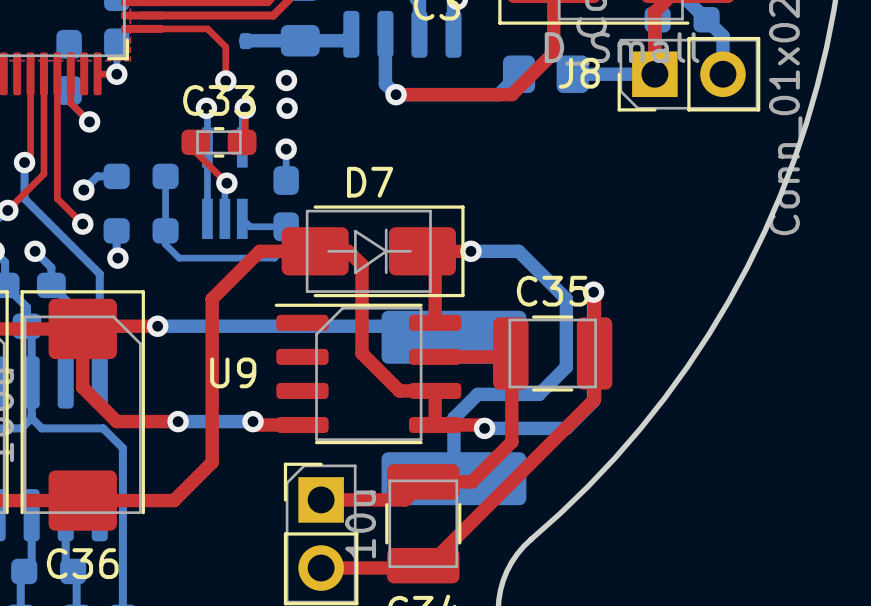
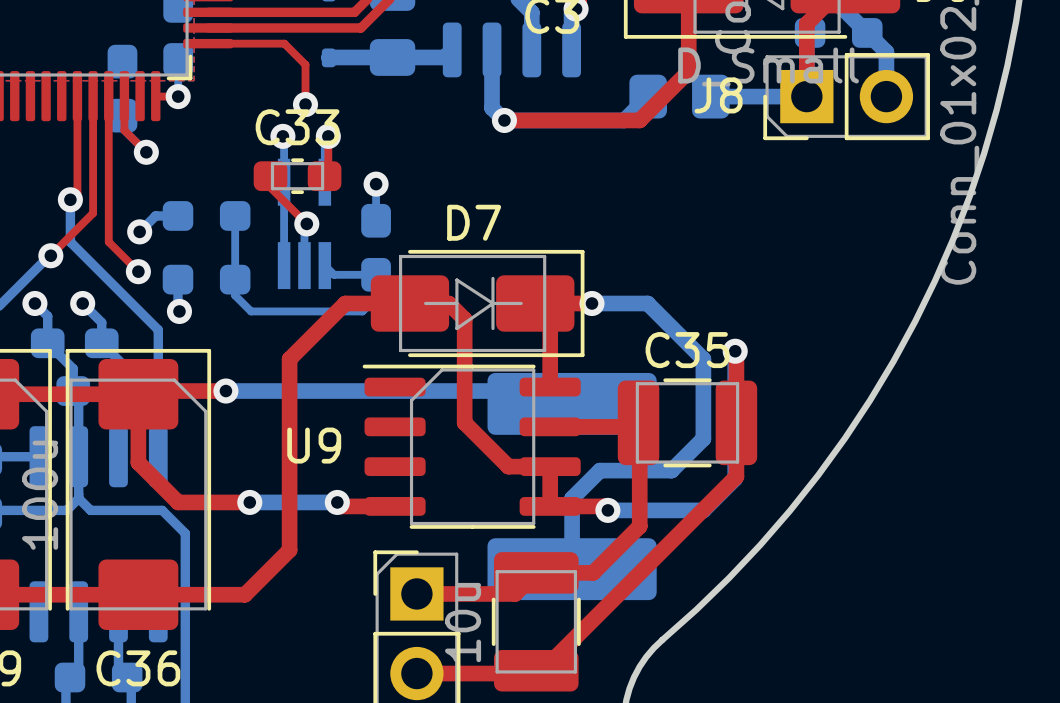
via: (286, 80) -> none
via: (287, 108) -> none

